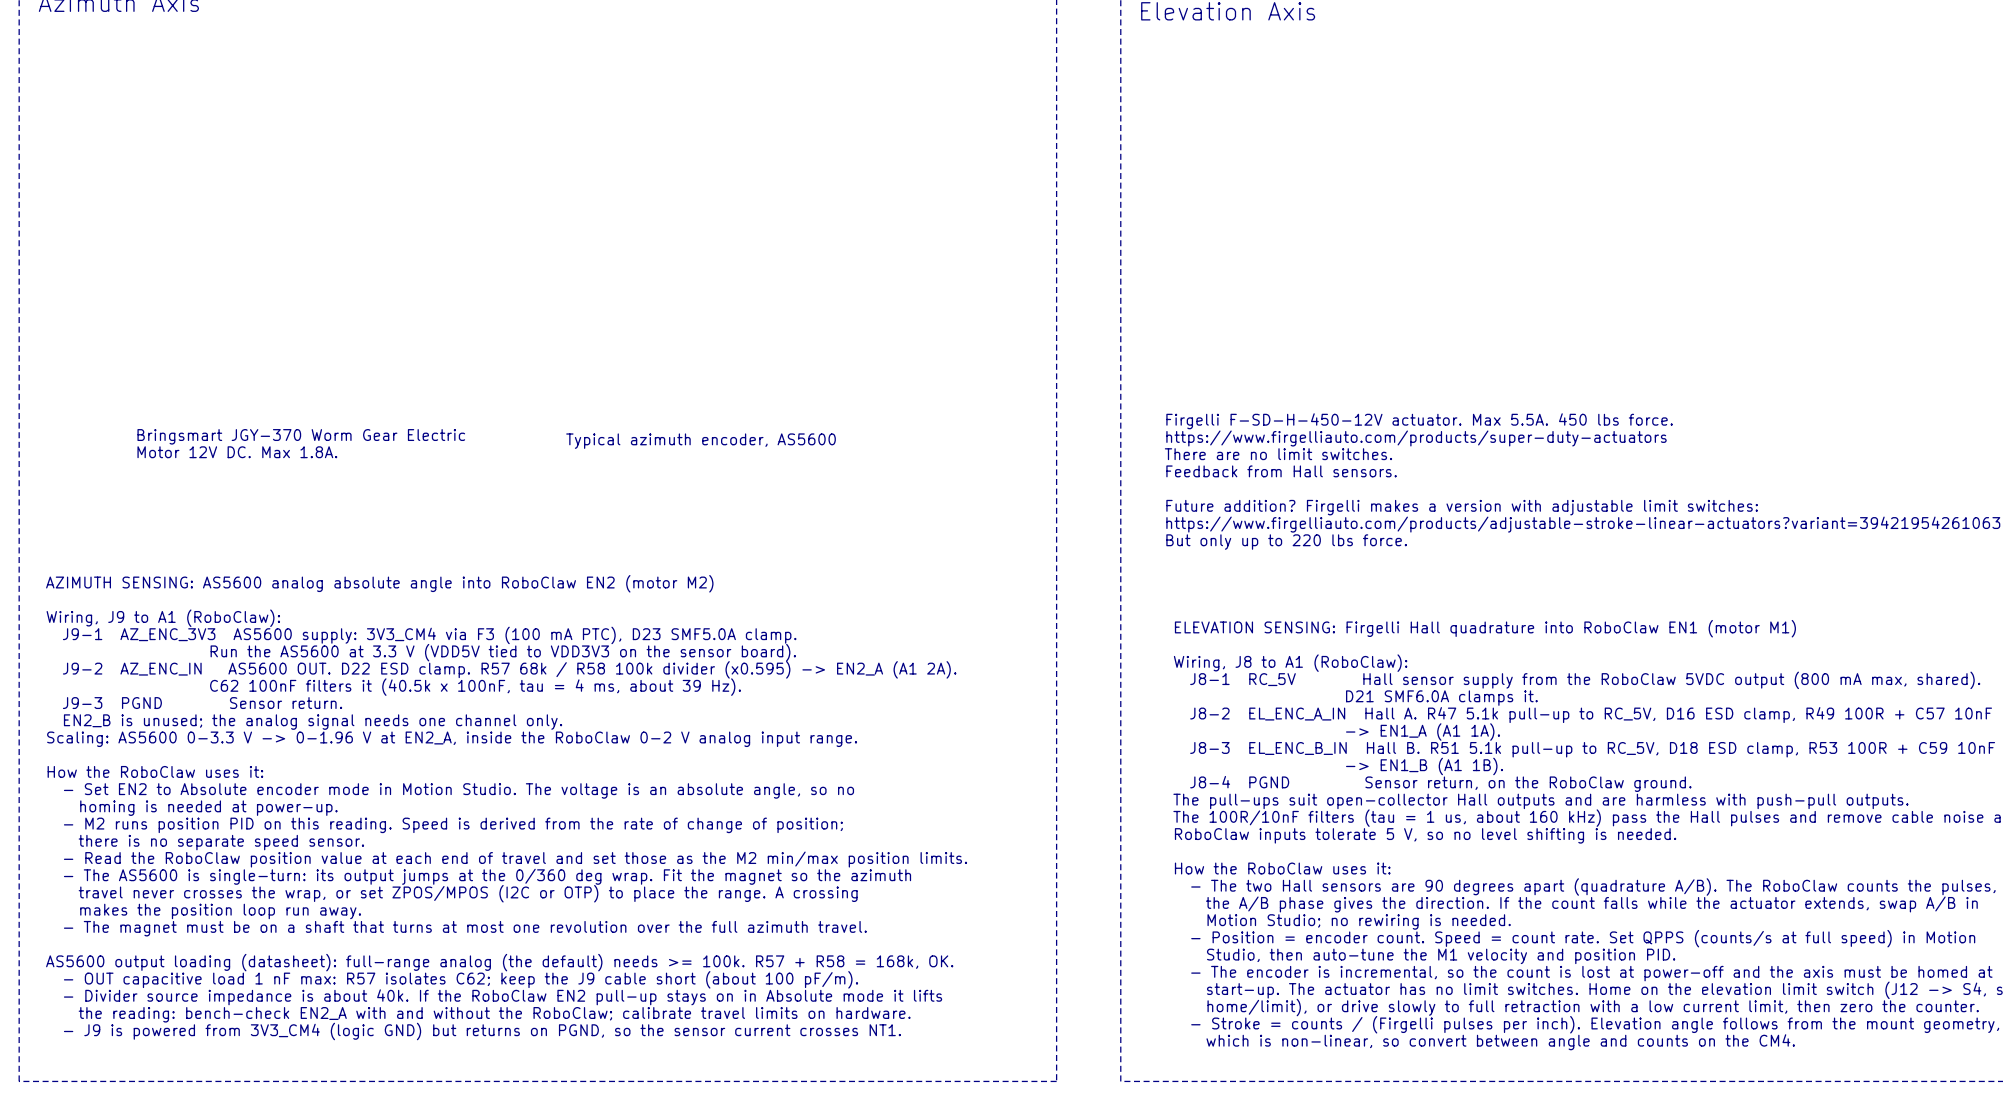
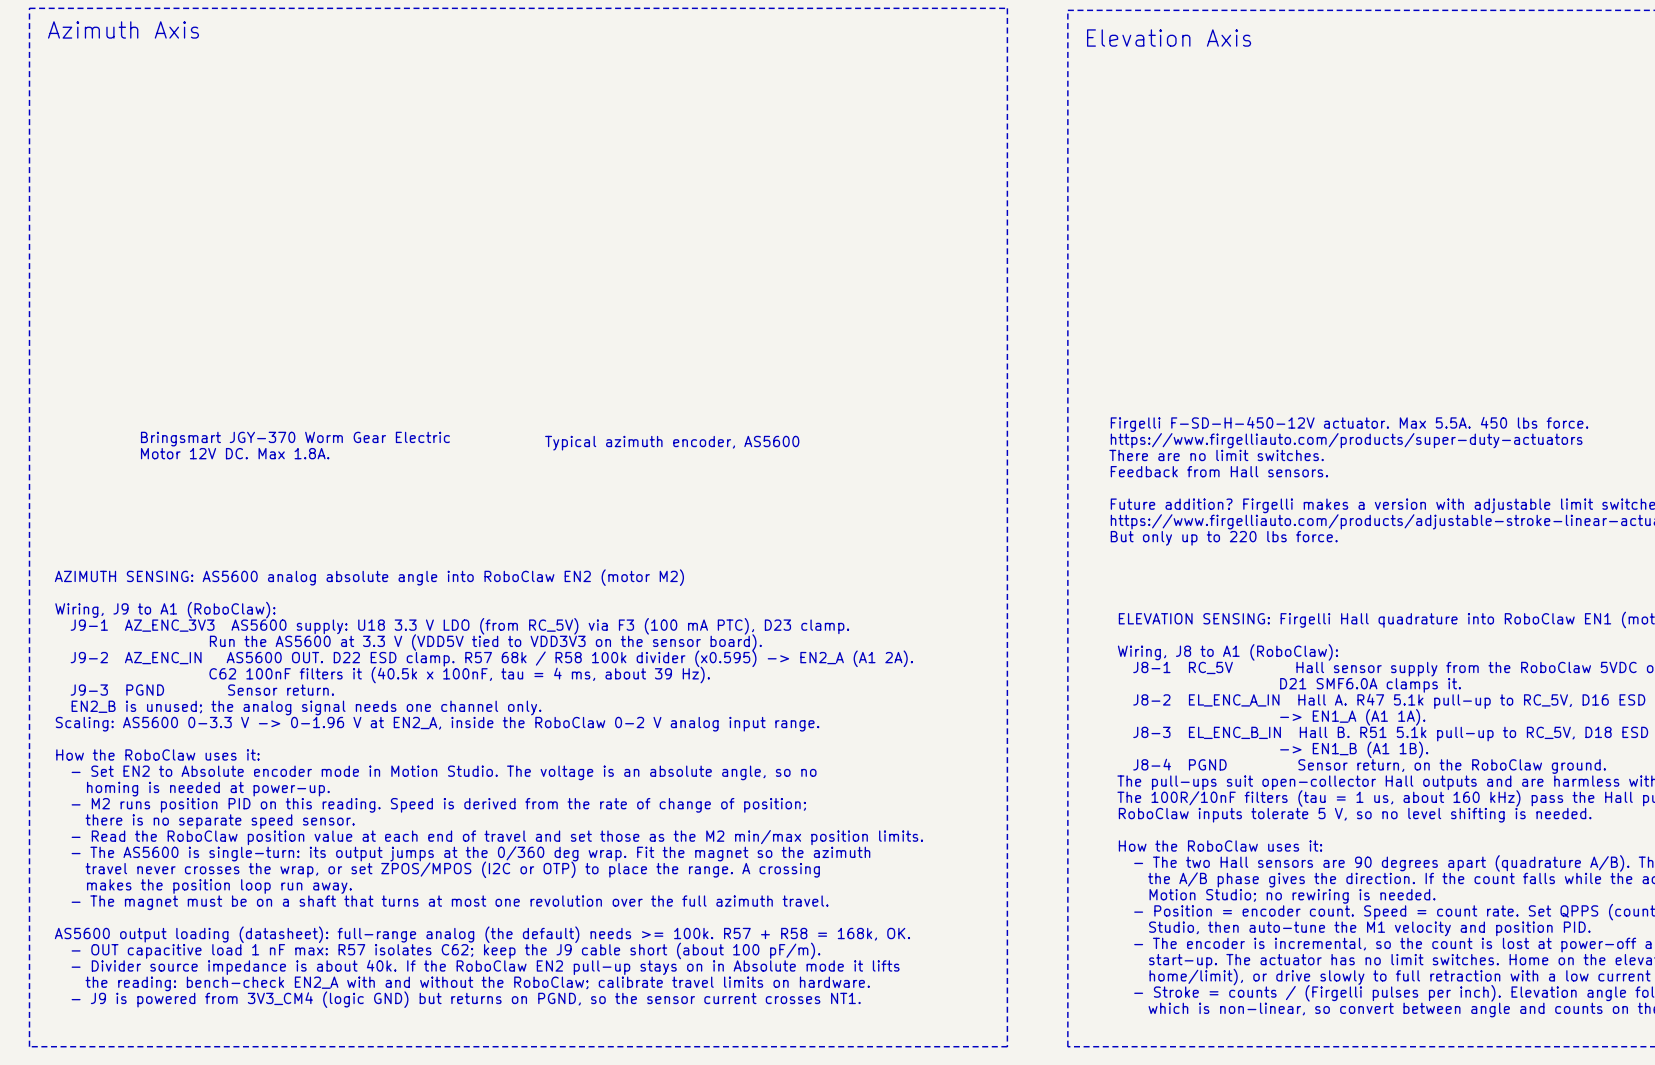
text: J9-1 AZ_ENC_3V3 AS5600 supply: 3V3_CM4 via F3 (100 mA PTC), D23 SMF5.0A clamp. (429, 635) -> J9-1 AZ_ENC_3V3 AS5600 supply: U18 3.3 V LDO (from RC_5V) via F3 (100 mA PTC), D23 clamp. (459, 626)

